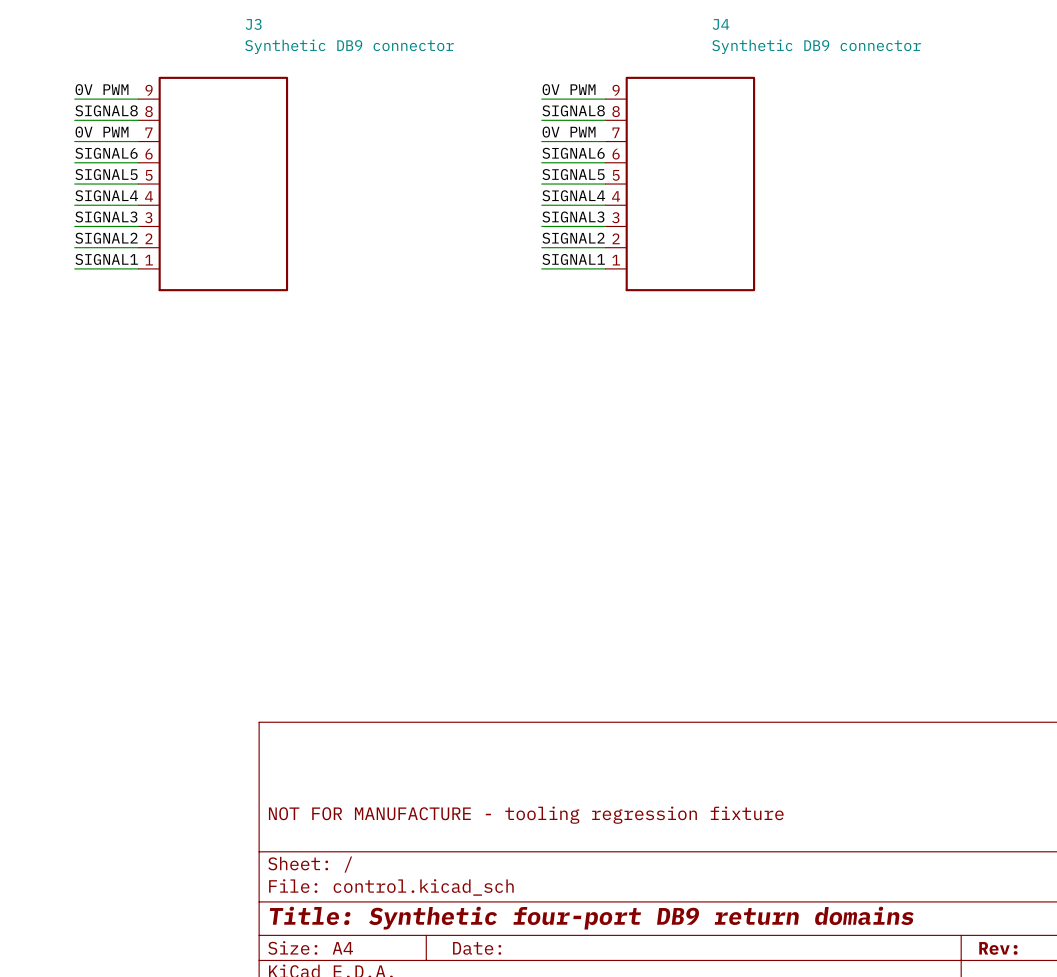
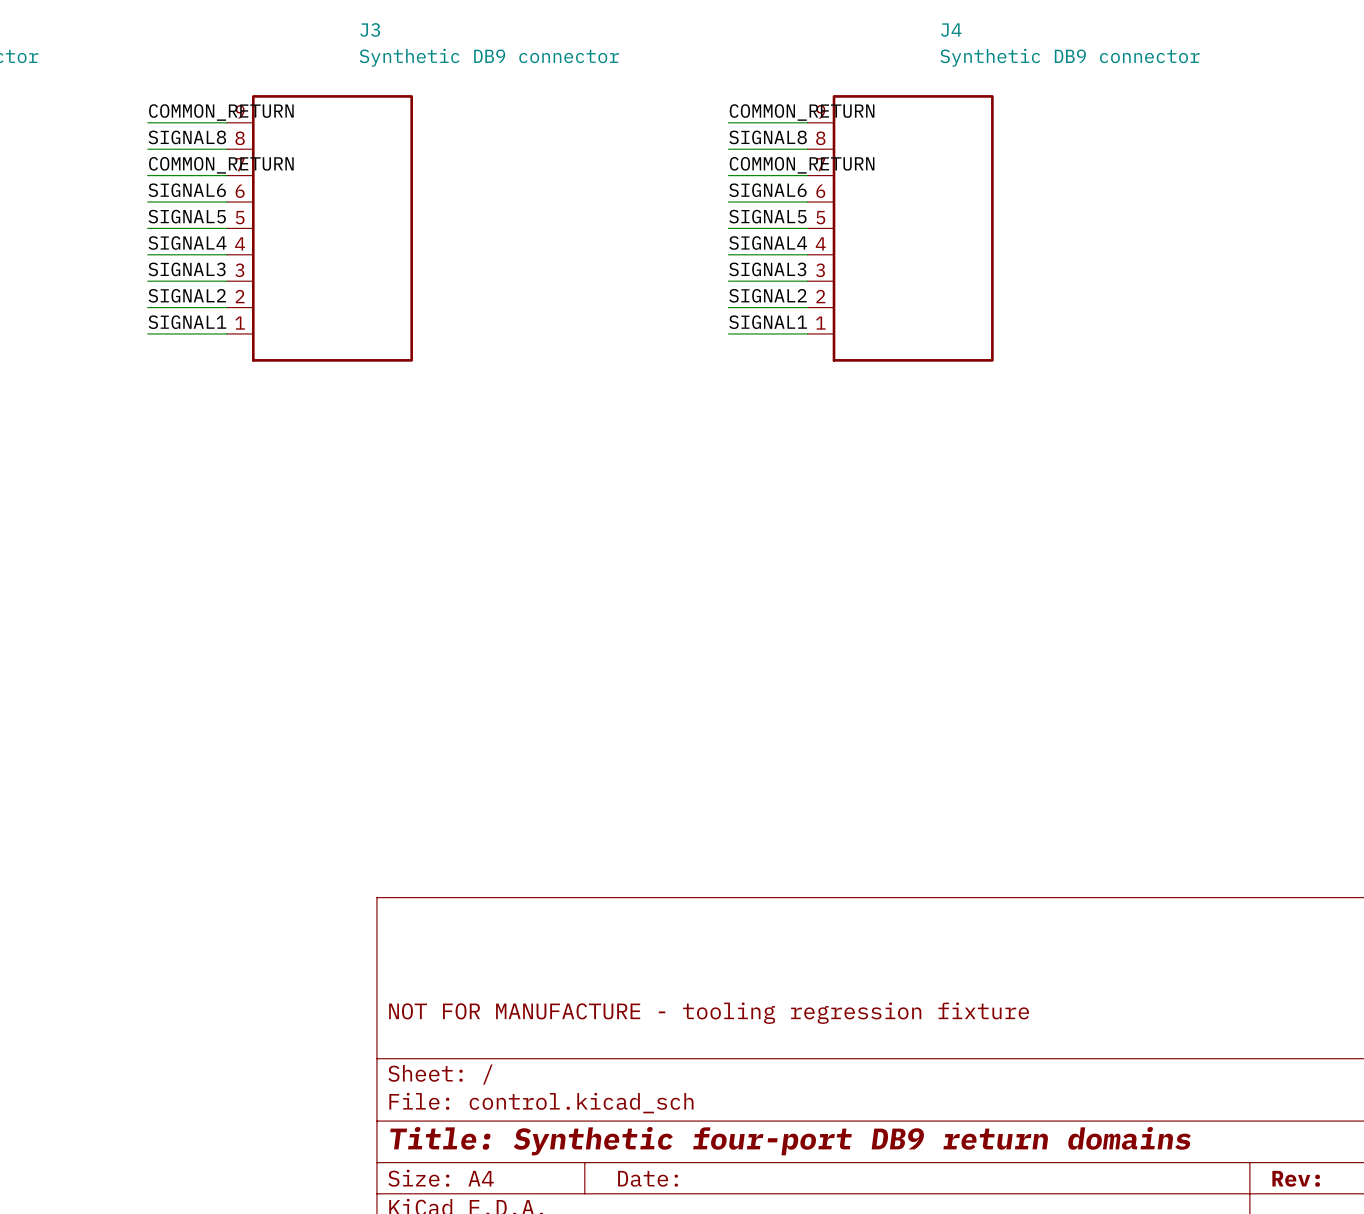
label: 0V PWM (102, 89) -> COMMON_RETURN (221, 112)
label: 0V PWM (569, 89) -> COMMON_RETURN (802, 112)
label: 0V PWM (102, 132) -> COMMON_RETURN (221, 165)
label: 0V PWM (569, 132) -> COMMON_RETURN (802, 165)

